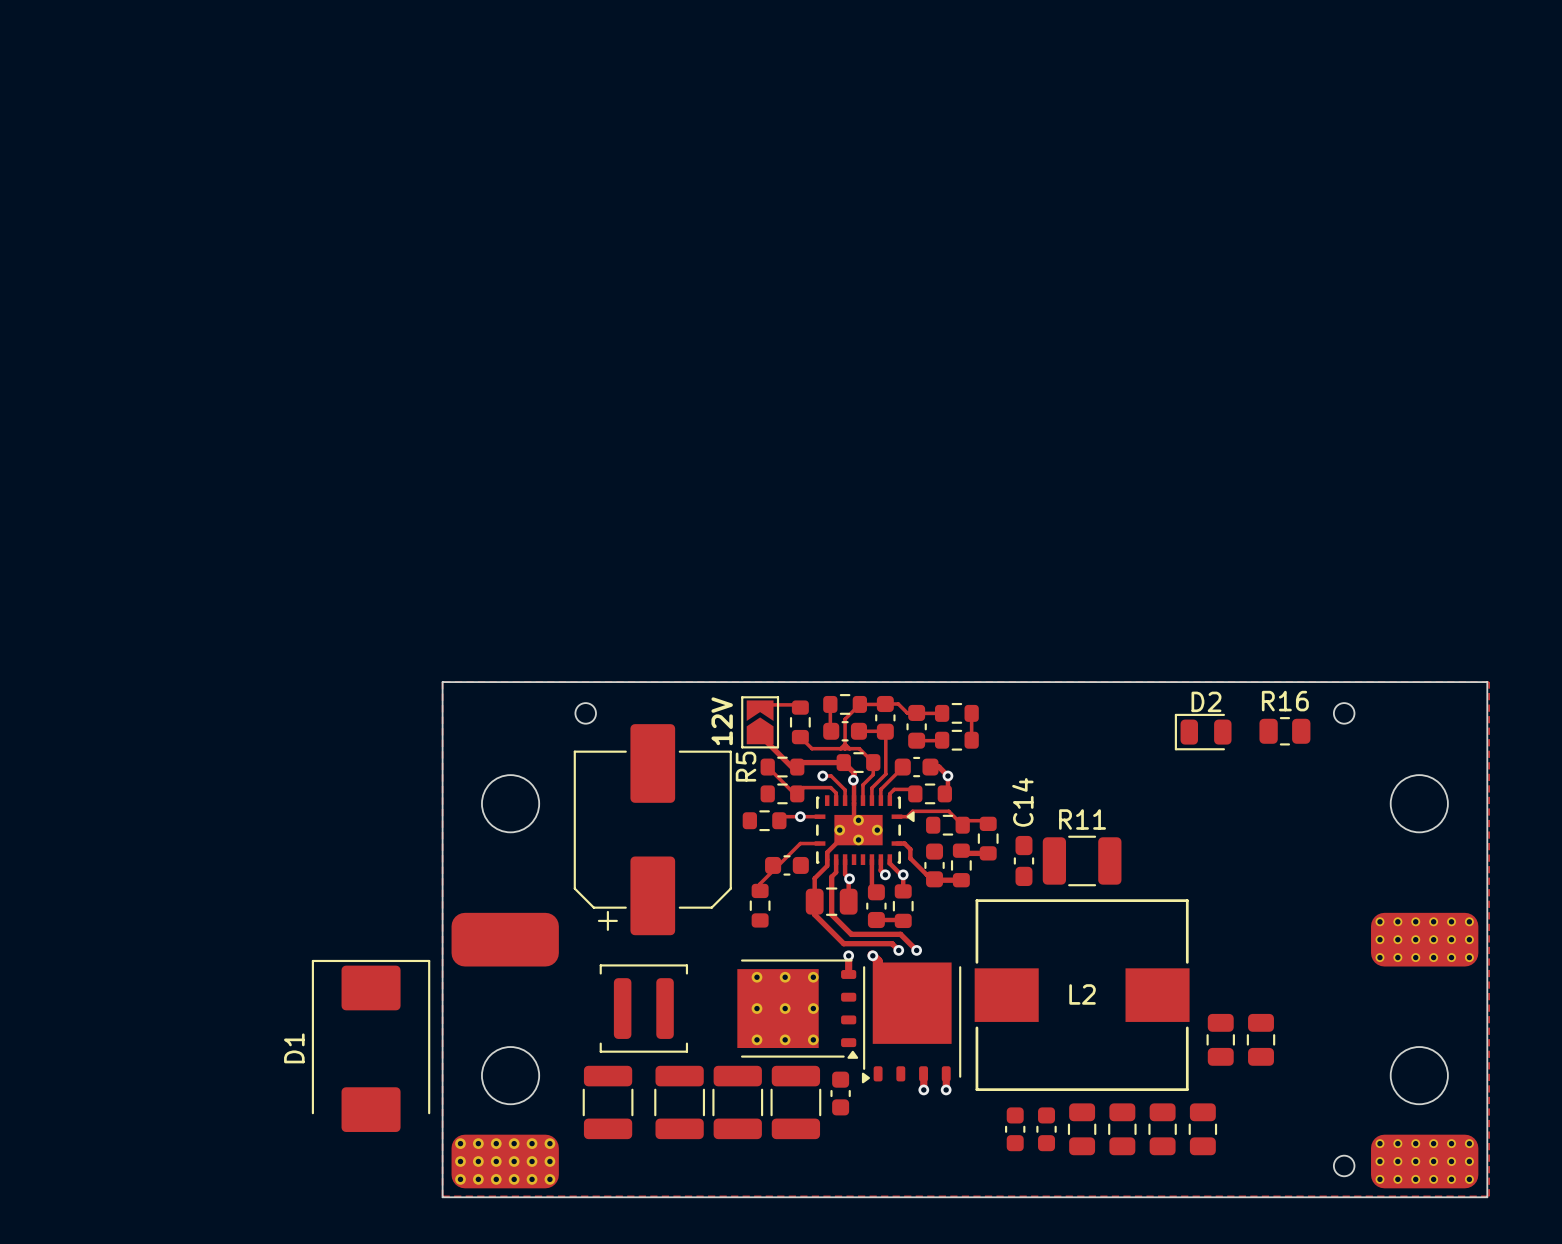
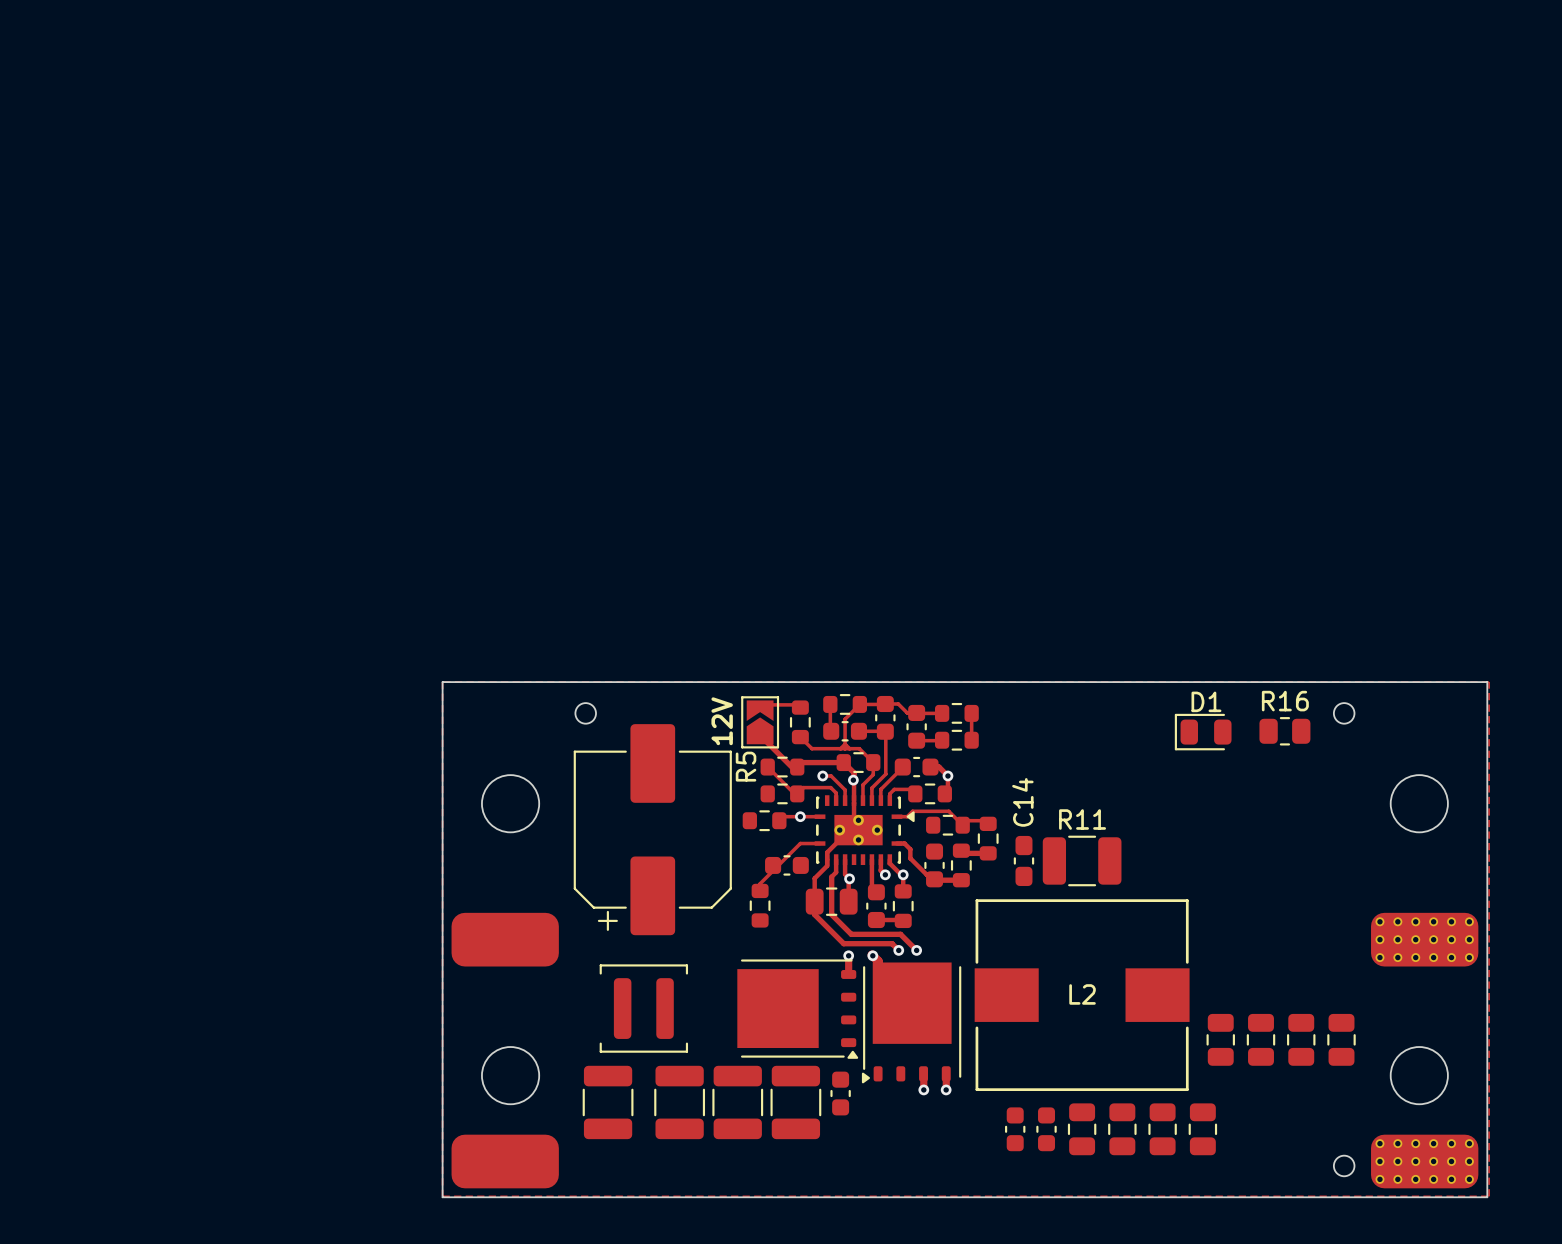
D2 name: D2 (1206, 701) -> D1 (1206, 701)
part footprint: [737, 959, 859, 1059] -> [737, 959, 859, 1059]
part: none -> (1301, 1039)
part: none -> (1341, 1039)
D1: (371, 1045) -> none
part footprint: [451, 1134, 559, 1189] -> [451, 1134, 559, 1189]

